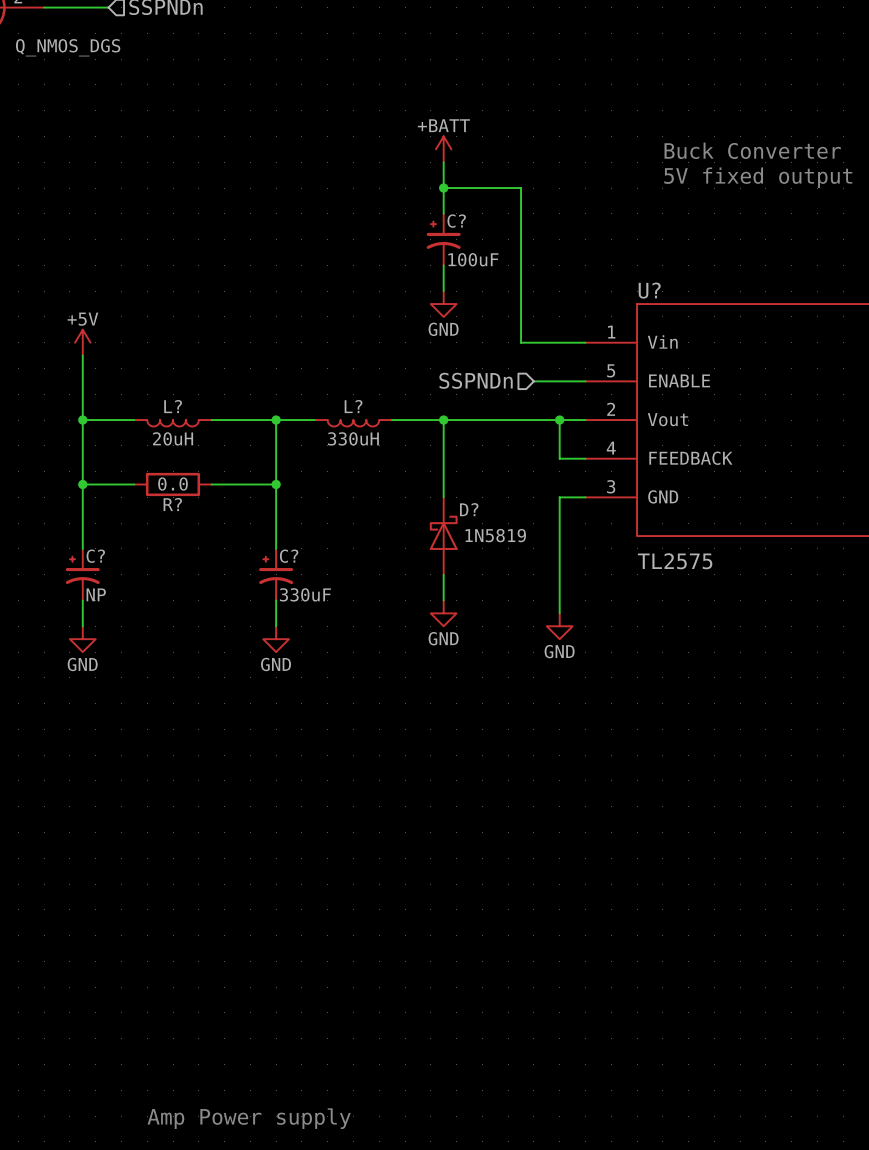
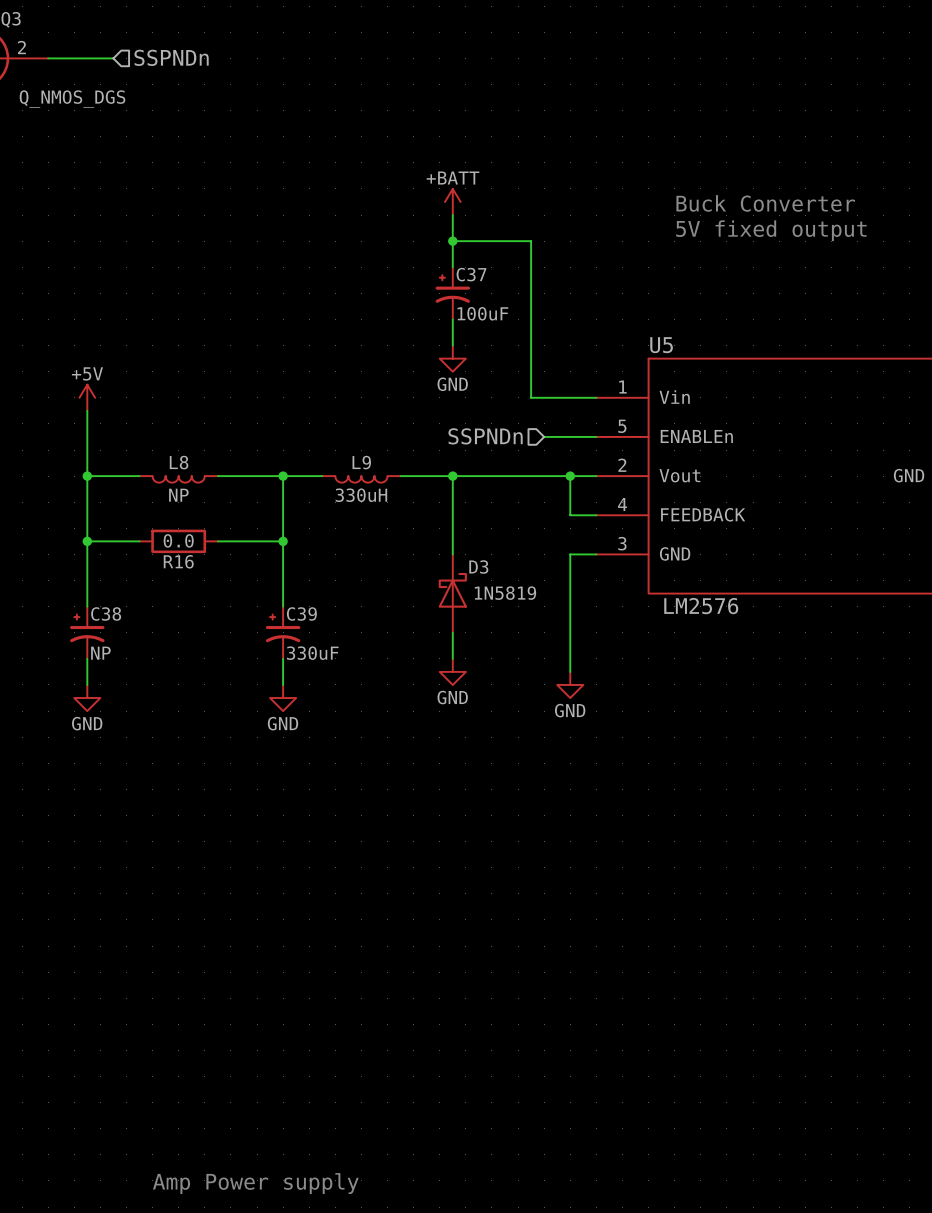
C? name: C? (456, 221) -> C37 (471, 274)
U? name: U? (649, 290) -> U5 (661, 345)
U? pin name: ENABLE (679, 380) -> ENABLEn (696, 436)
L? name: L? (173, 406) -> L8 (179, 462)
L? name: L? (353, 406) -> L9 (361, 462)
L? value: 20uH (173, 438) -> NP (178, 495)
R? name: R? (172, 504) -> R16 (178, 561)
D? name: D? (469, 509) -> D3 (478, 567)
C? name: C? (95, 556) -> C38 (106, 614)
C? name: C? (289, 556) -> C39 (301, 614)
U? value: TL2575 (675, 561) -> LM2576 (701, 606)

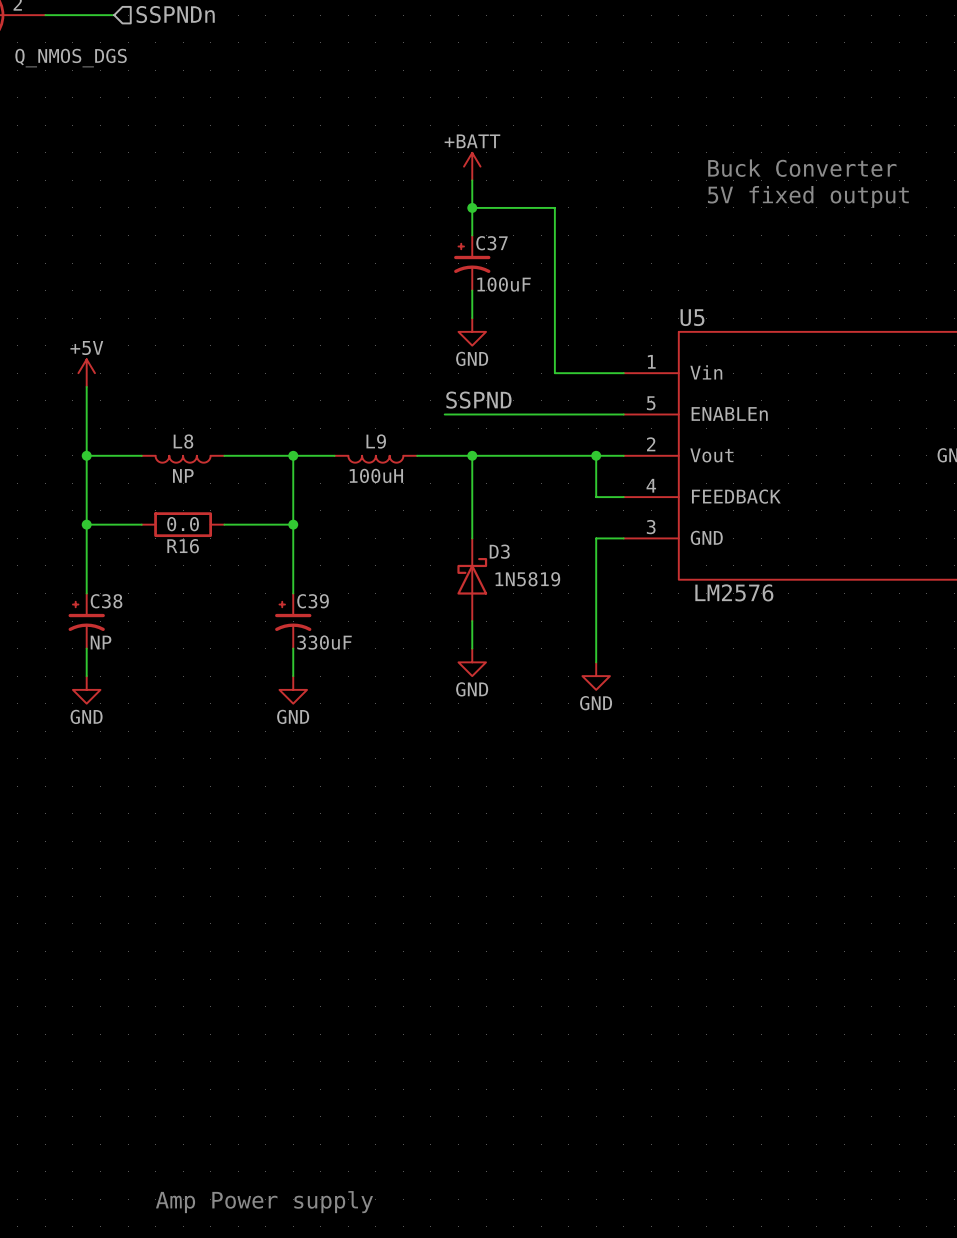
label: none -> SSPND (478, 400)
wire: none -> (444, 414) (568, 414)
hierarchical label: SSPNDn (485, 436) -> none
L9 value: 330uH (361, 495) -> 100uH (376, 475)

